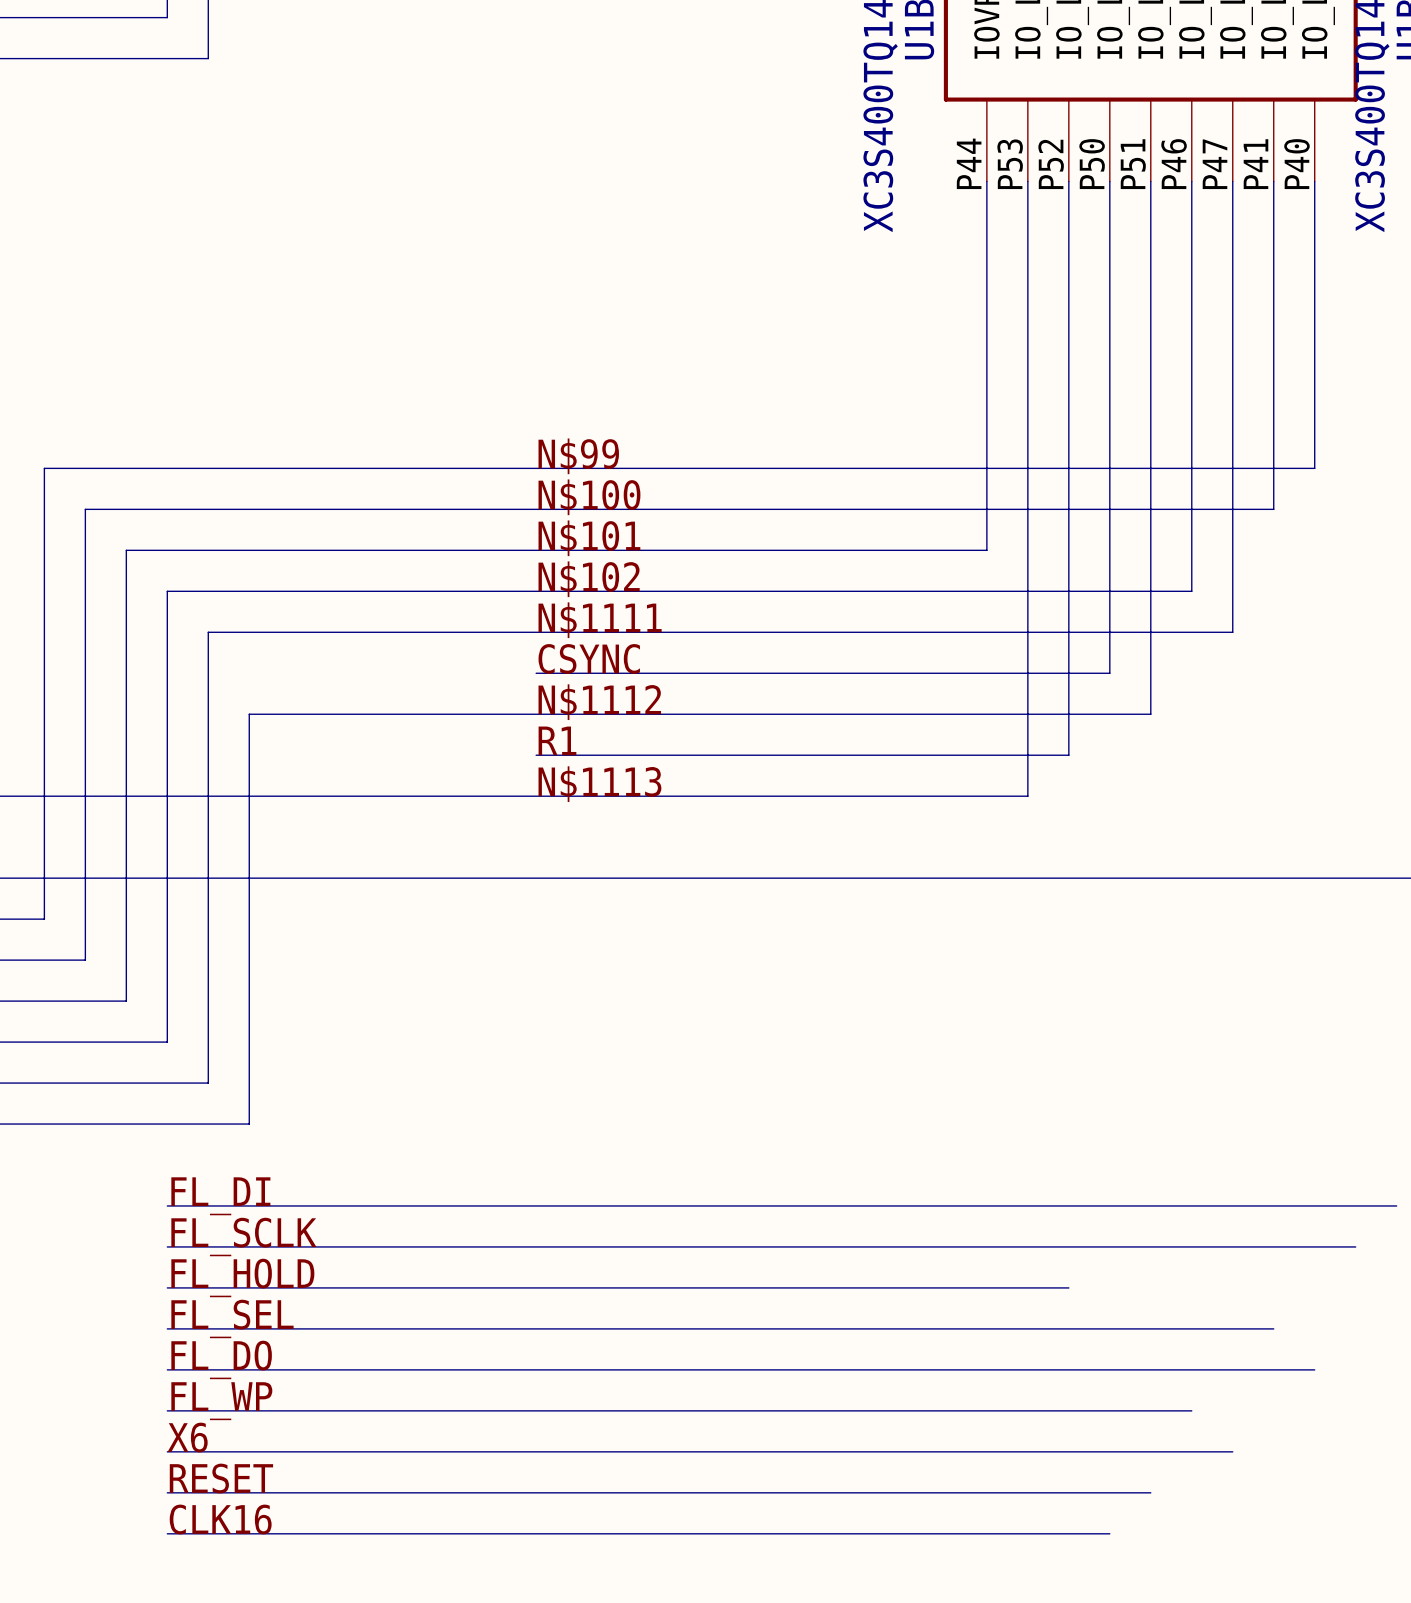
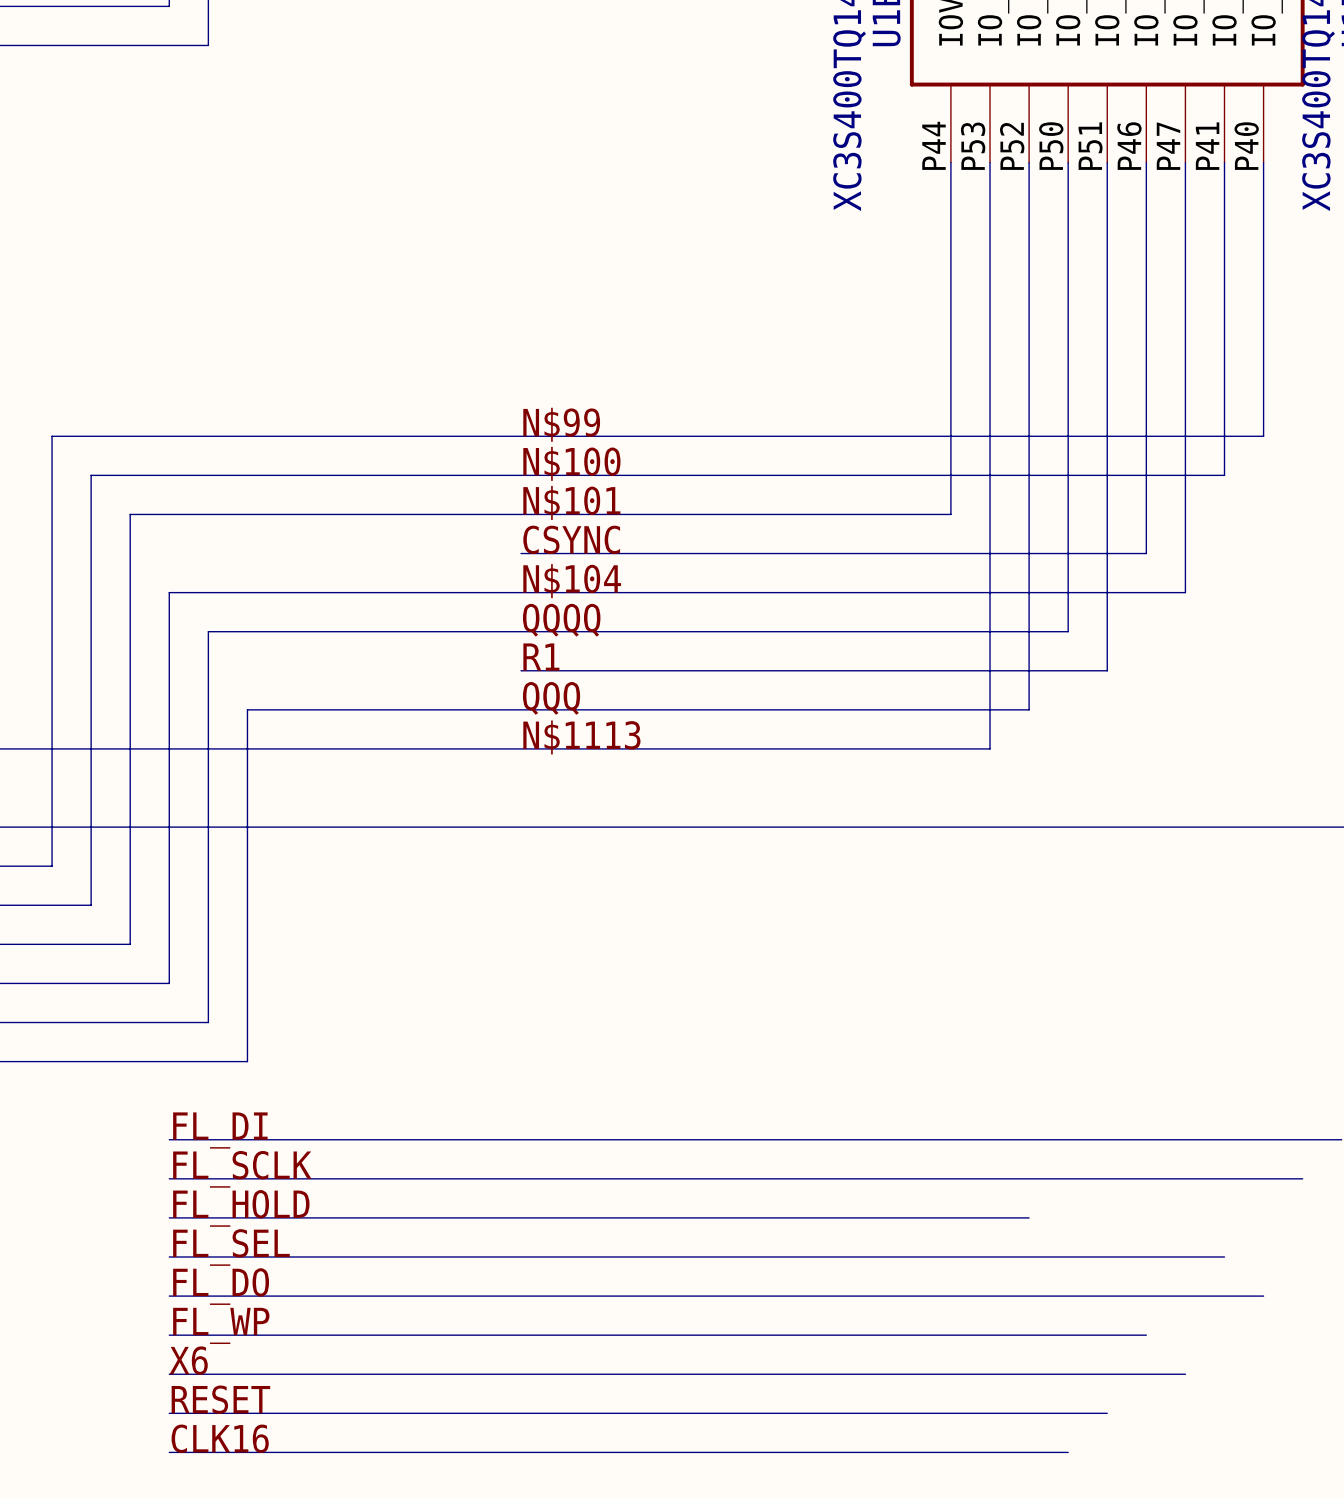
label: N$102 (589, 579) -> CSYNC (571, 539)
wire: (536, 591) (167, 591) (167, 632) -> none
label: N$1111 (600, 620) -> N$104 (572, 581)
wire: (208, 632) (208, 673) -> (208, 592) (169, 592)
label: CSYNC (589, 658) -> QQQQ (561, 620)
wire: none -> (208, 631) (521, 631)
label: N$1112 (599, 702) -> R1 (541, 657)
wire: (536, 714) (249, 714) (249, 755) -> (521, 709) (247, 709)
label: R1 (557, 740) -> QQQ (551, 698)

